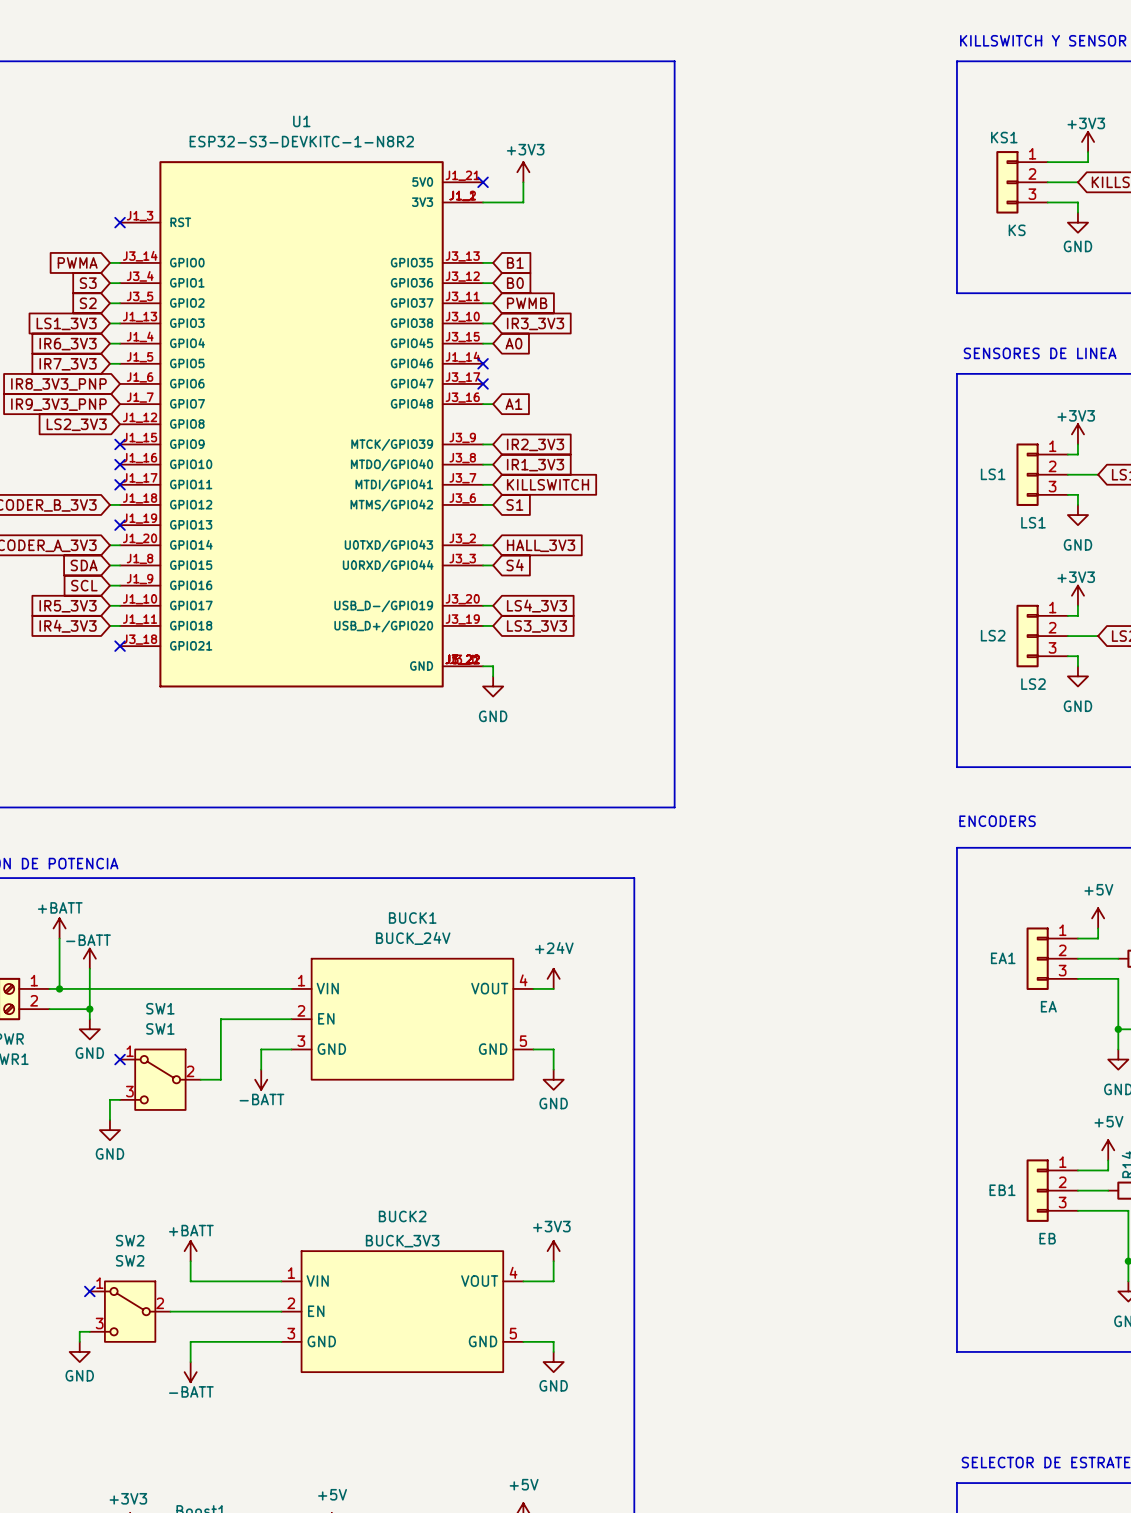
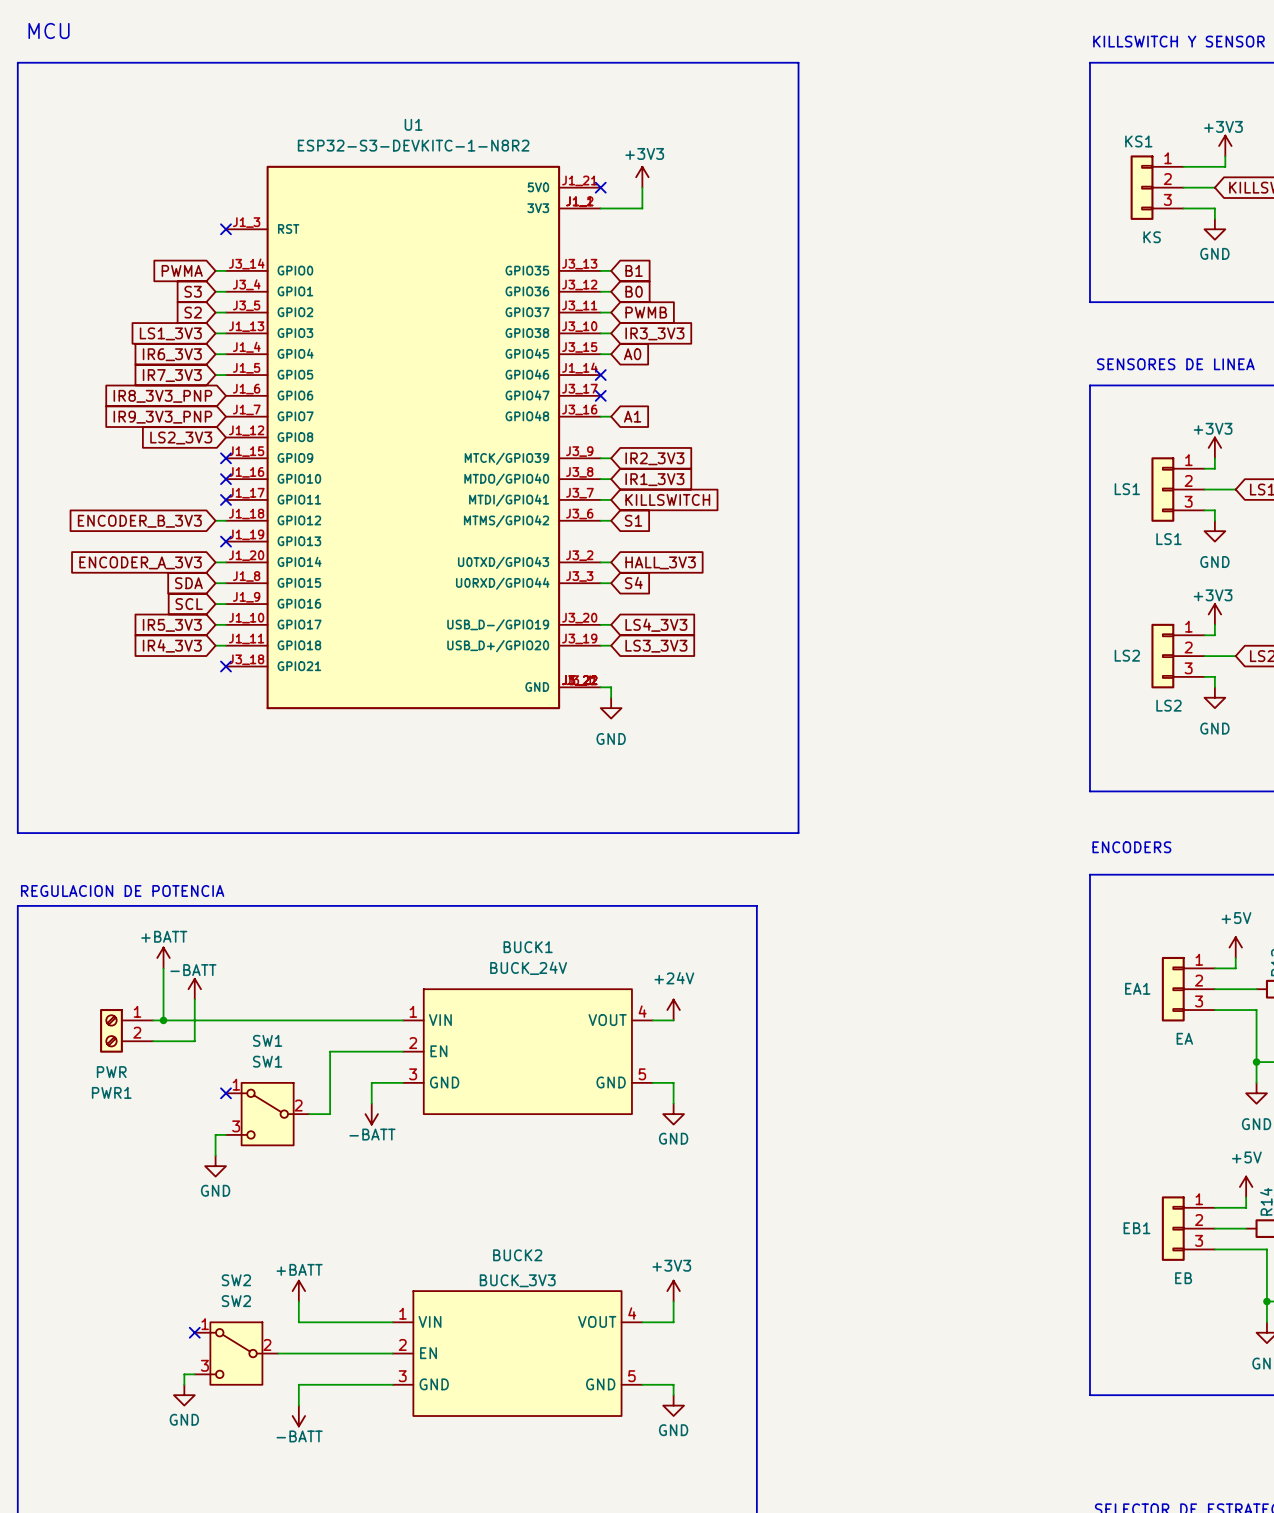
wire: (89, 1009) (89, 1019) -> none
junction: (89, 1009) -> none
power symbol: GND (89, 1029) -> none

